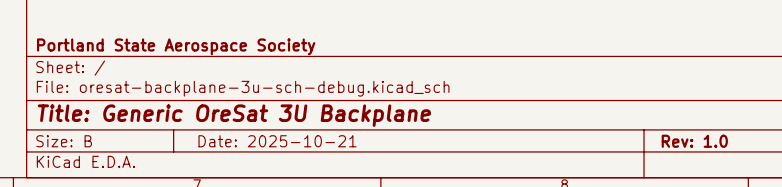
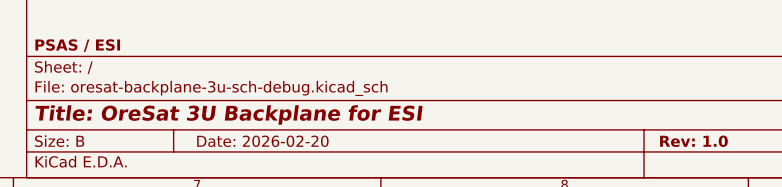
title block: Portland State Aerospace Society (176, 46) -> PSAS / ESI (77, 45)
title block: Title: Generic OreSat 3U Backplane (234, 115) -> Title: OreSat 3U Backplane for ESI (229, 114)
title block: Date: 2025-10-21 (277, 141) -> Date: 2026-02-20 (262, 141)

